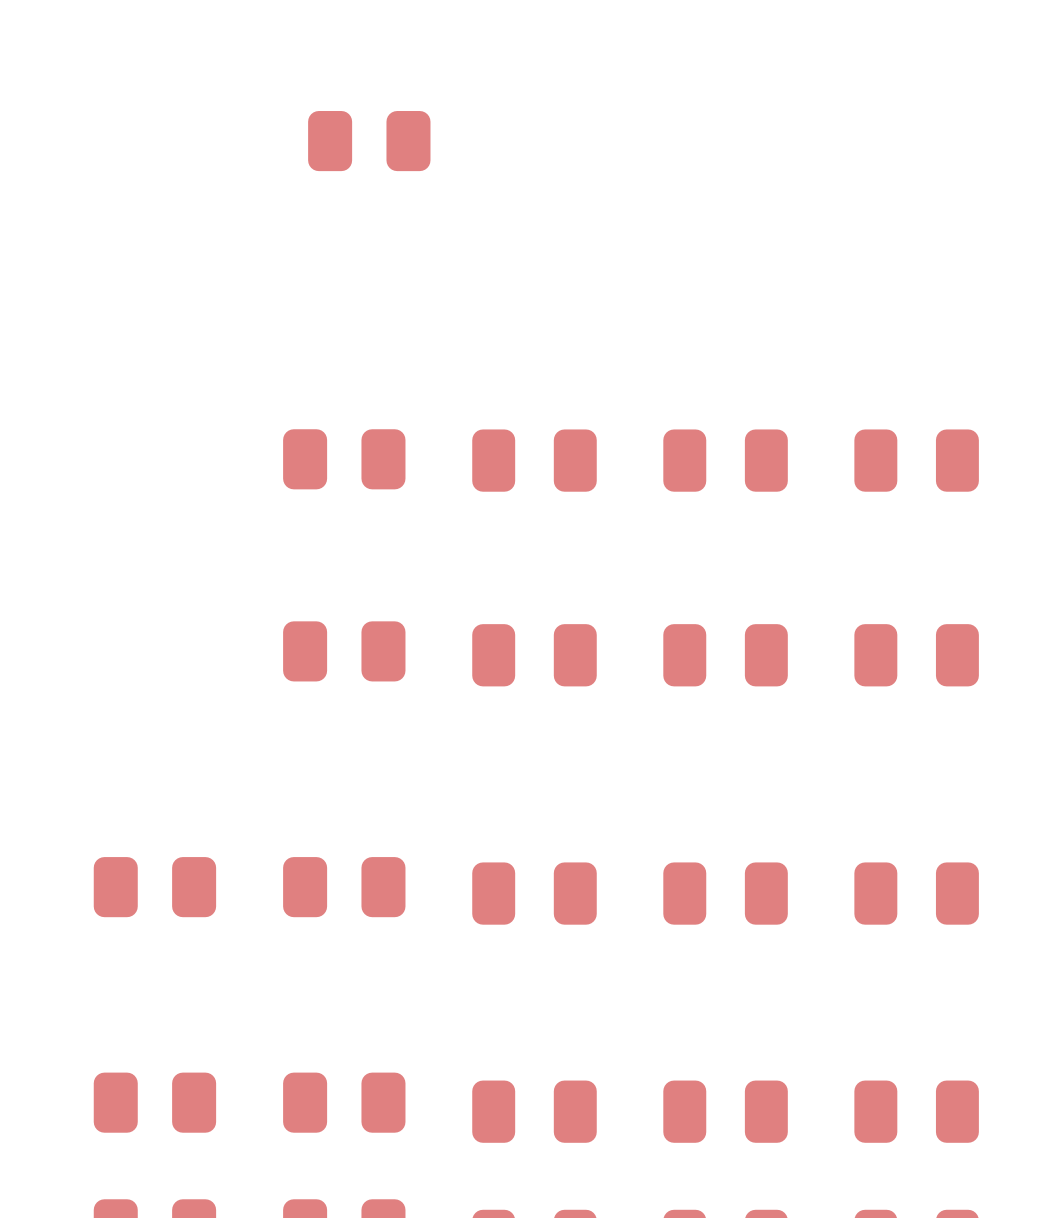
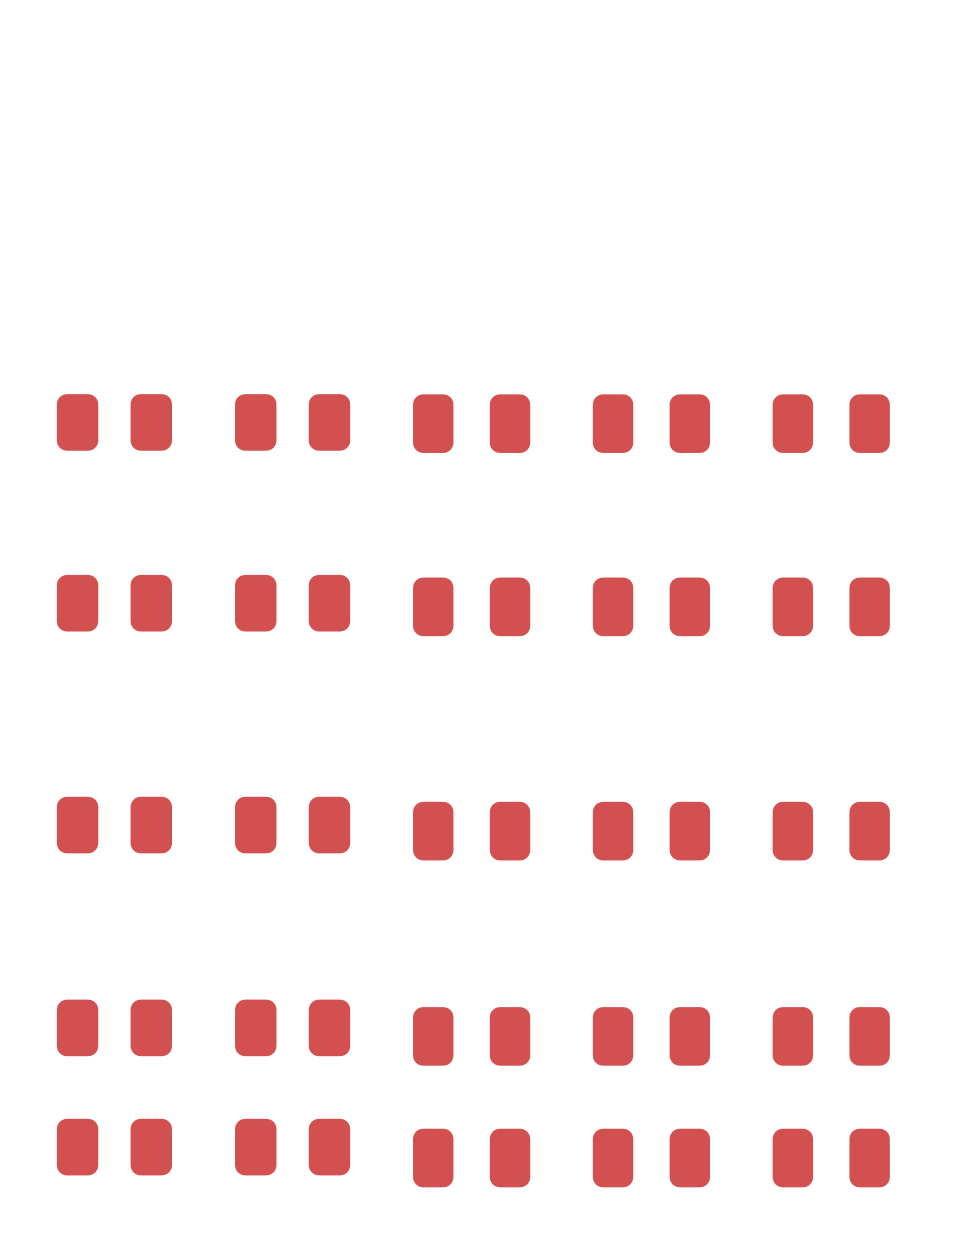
part: (369, 141) -> none
part: none -> (114, 422)
part: none -> (114, 603)

